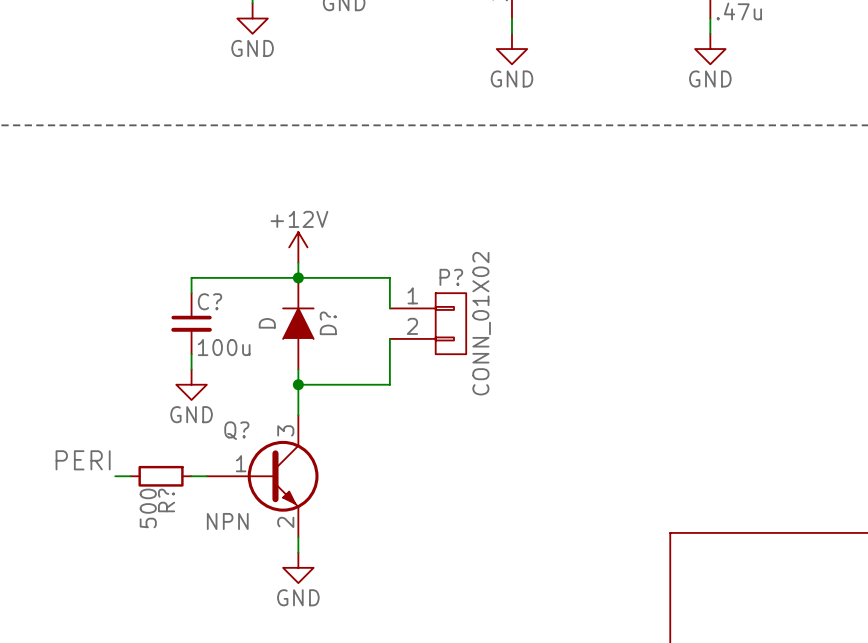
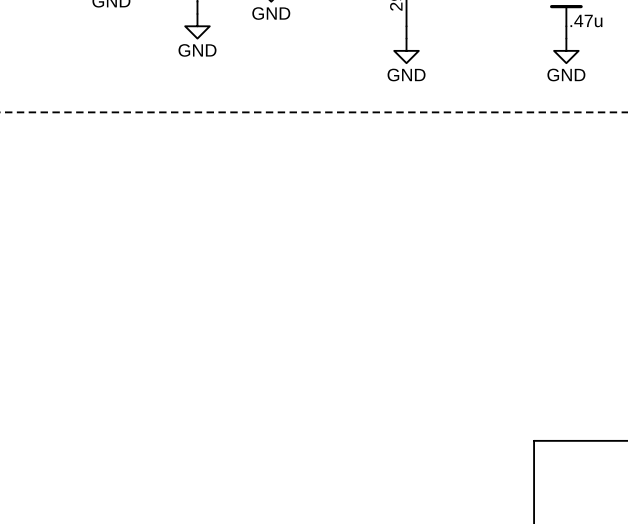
power symbol: +12V (298, 247) -> none
wire: (298, 262) (298, 277) -> none
junction: (298, 277) -> none
wire: (191, 293) (191, 277) (389, 277) (389, 308) -> none
C?: 100u (191, 323) -> none
D?: D (298, 323) -> none
P?: CONN_01X02 (428, 323) -> none
wire: (389, 338) (389, 384) (298, 384) -> none
wire: (191, 354) (191, 369) -> none
wire: (298, 369) (298, 415) -> none
power symbol: GND (191, 384) -> none
junction: (298, 384) -> none
label: PERI (83, 460) -> none
wire: (115, 476) (130, 476) -> none
R?: 500 (161, 476) -> none
wire: (191, 476) (206, 476) -> none
Q?: NPN (262, 476) -> none
wire: (298, 537) (298, 552) -> none
power symbol: GND (298, 567) -> none

